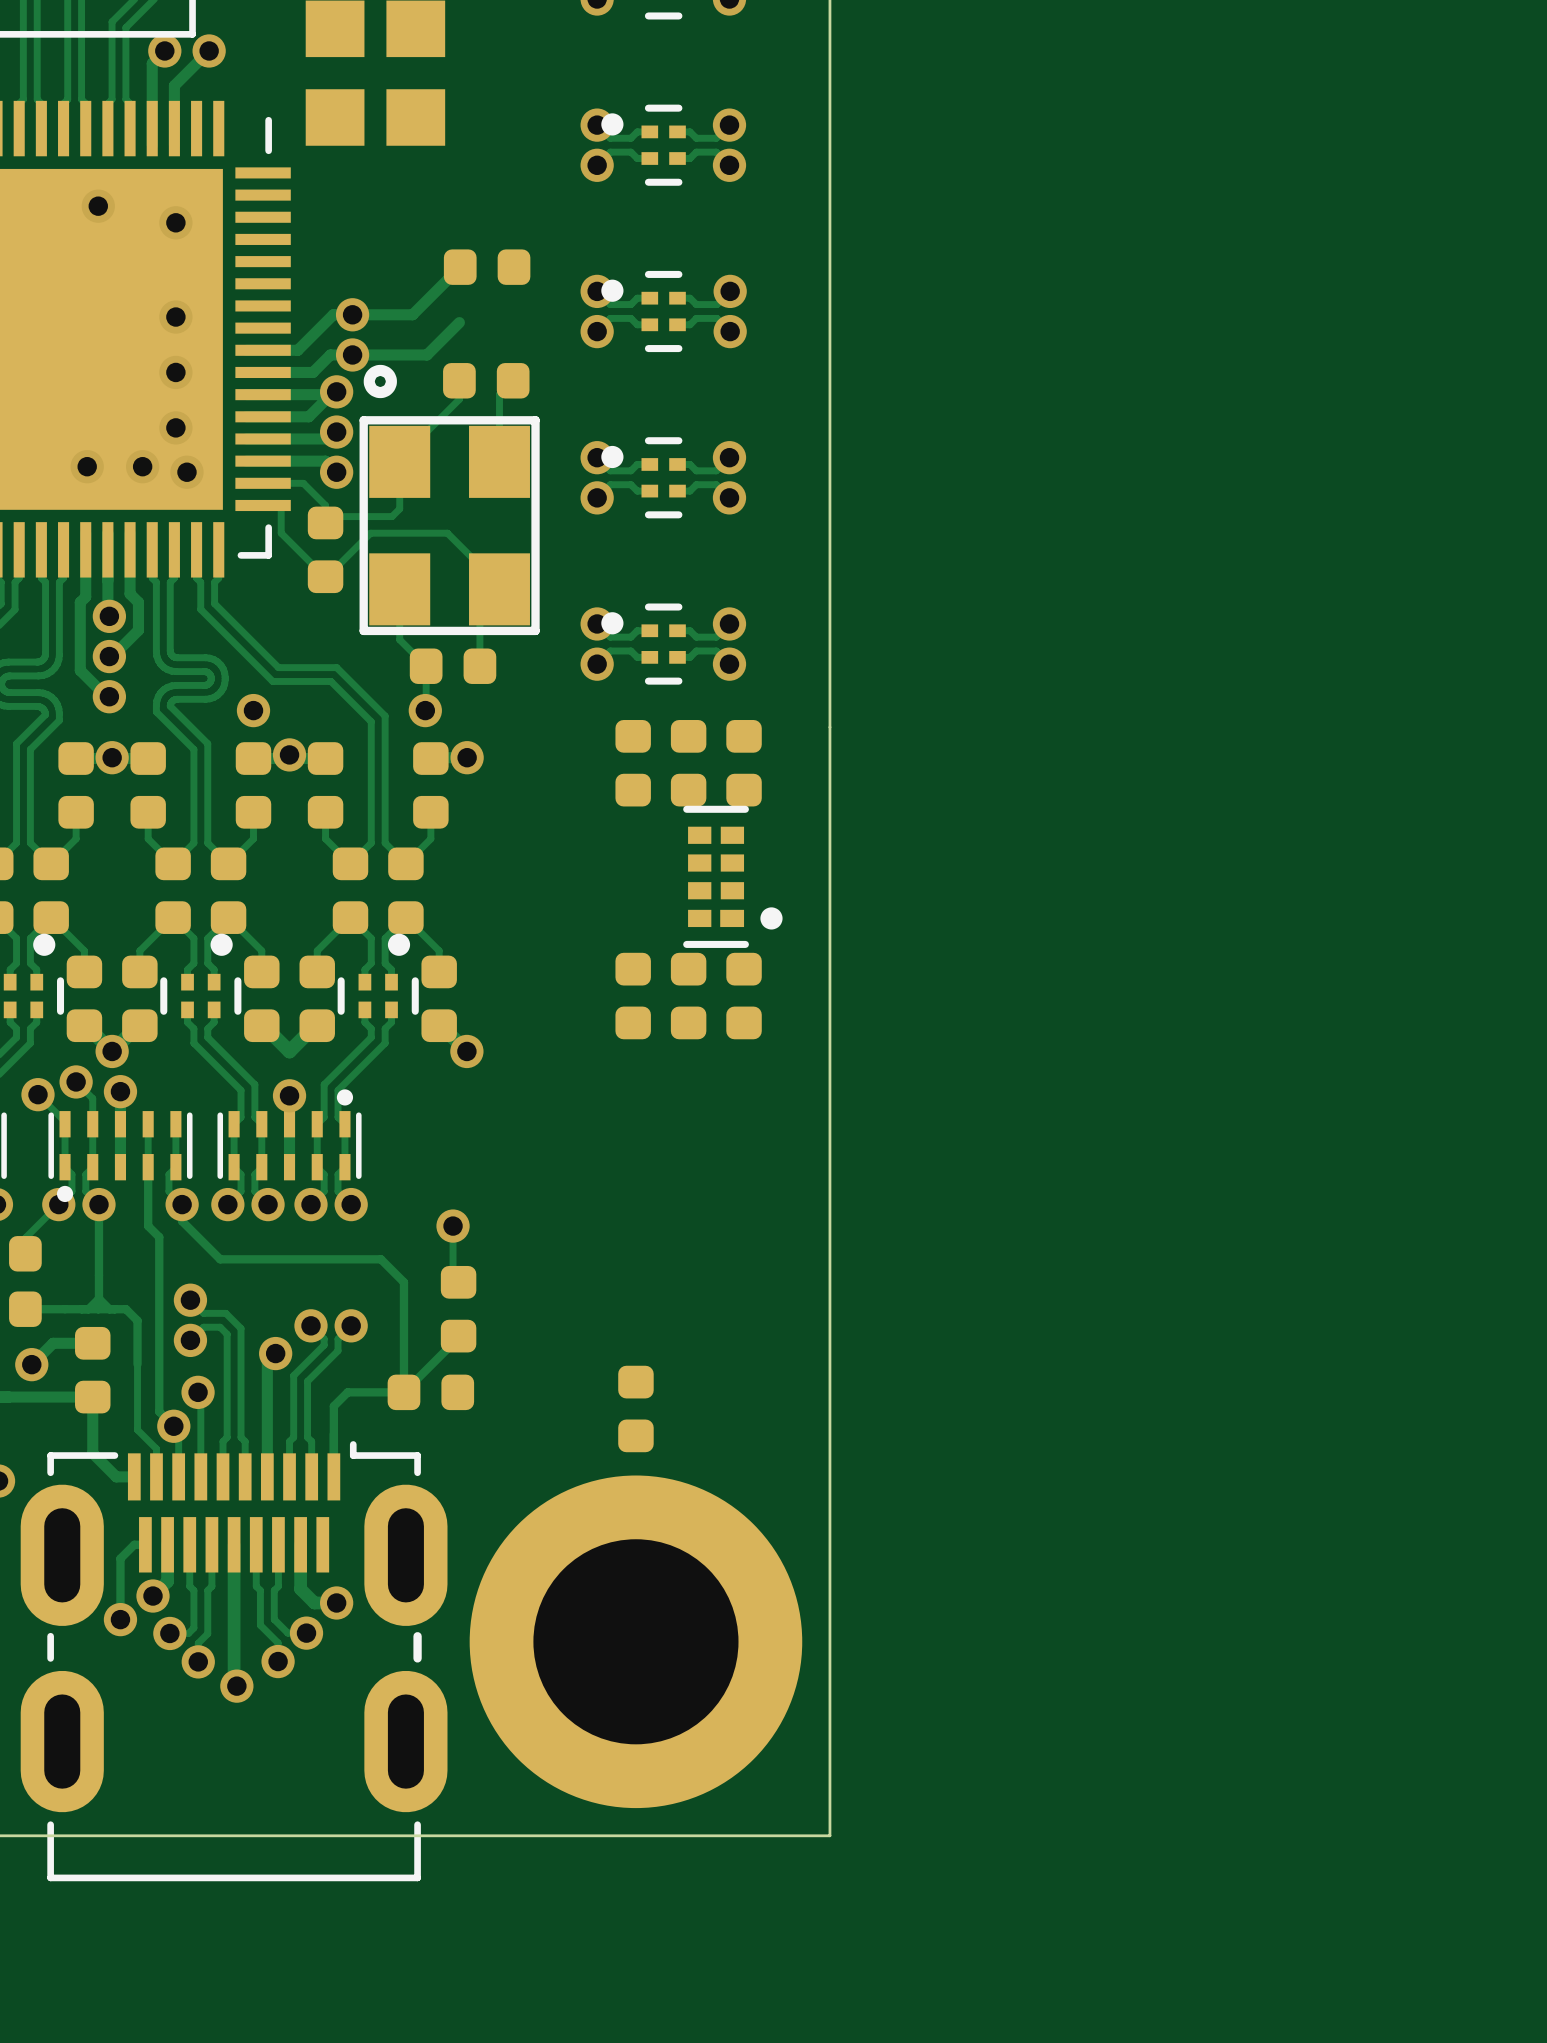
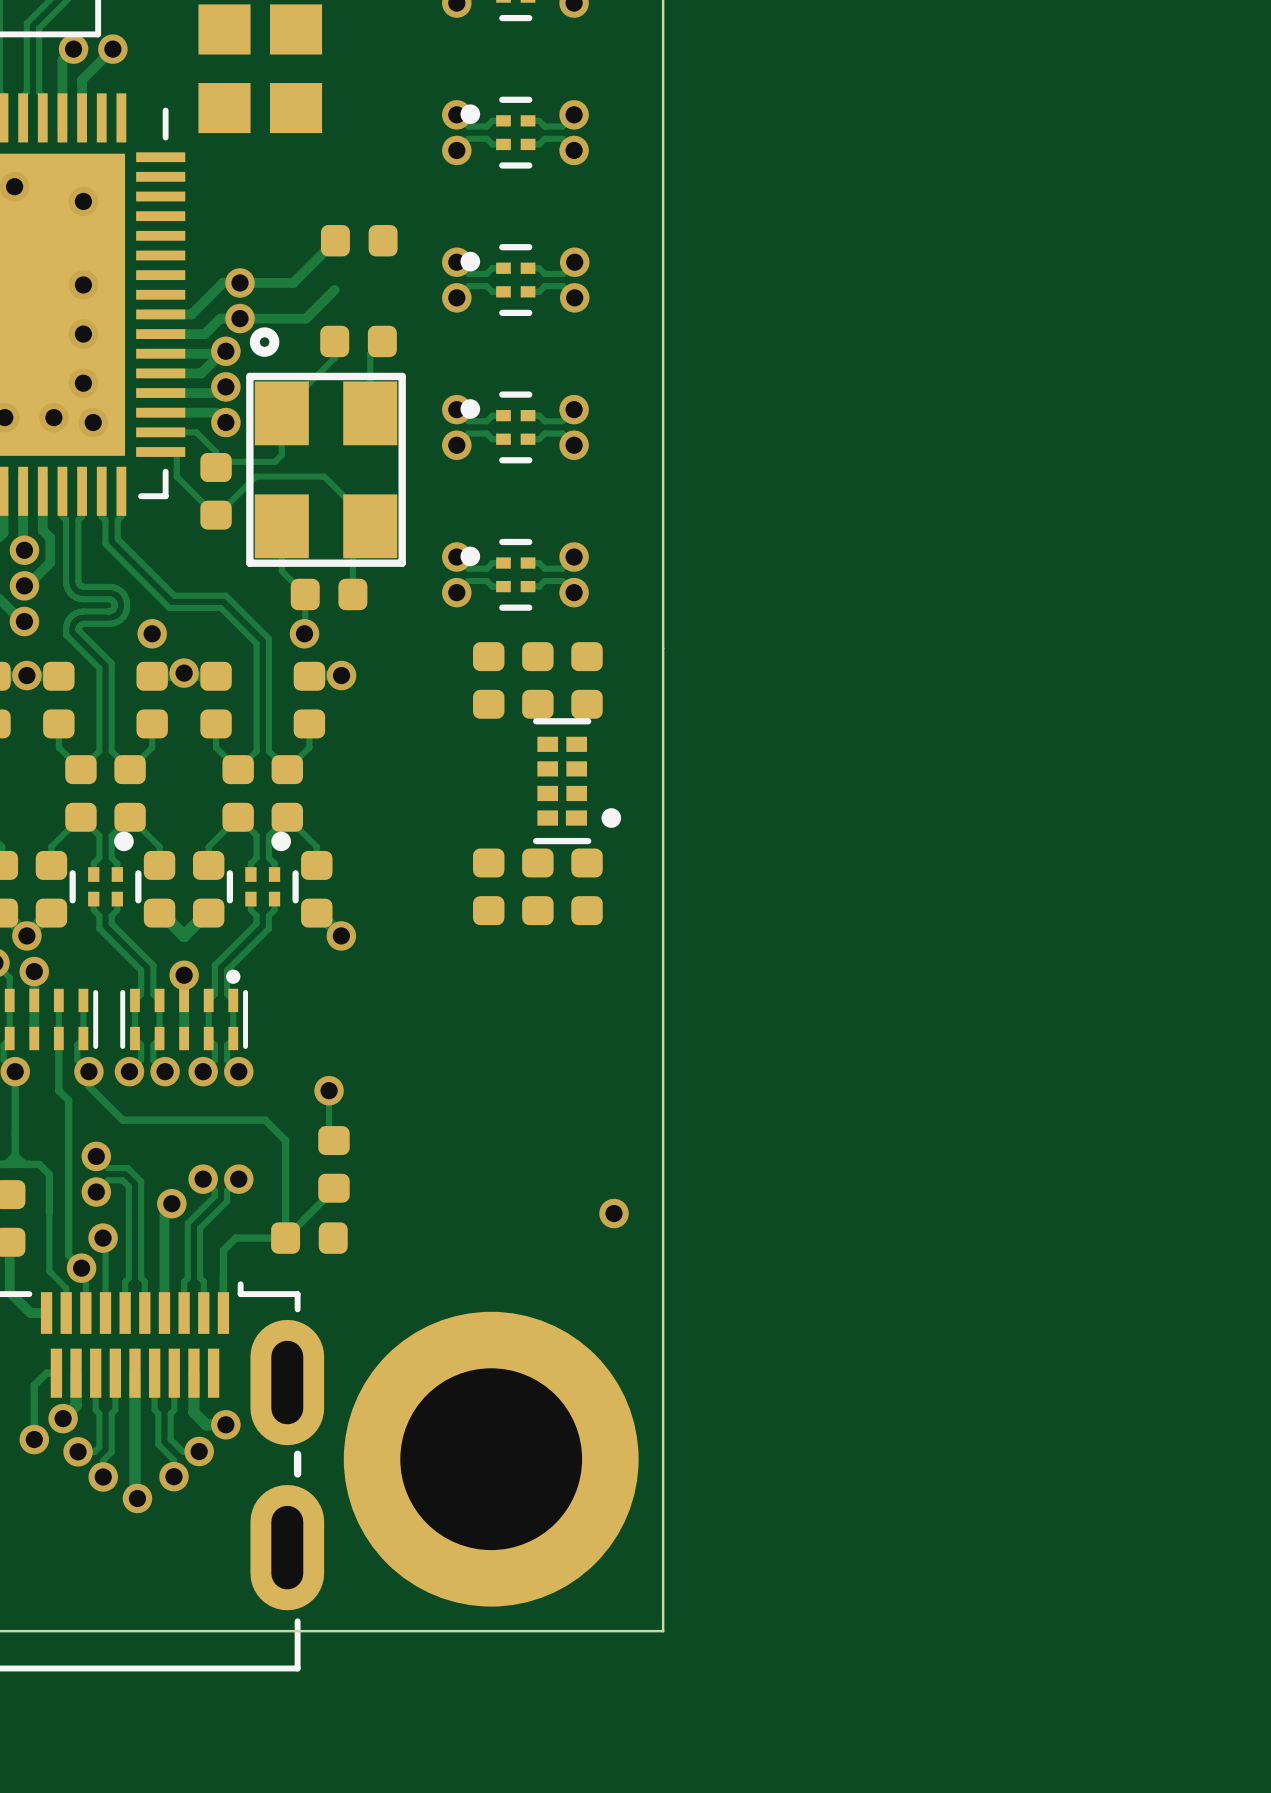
via: none -> (614, 1213)
part: (635, 1408) -> none

